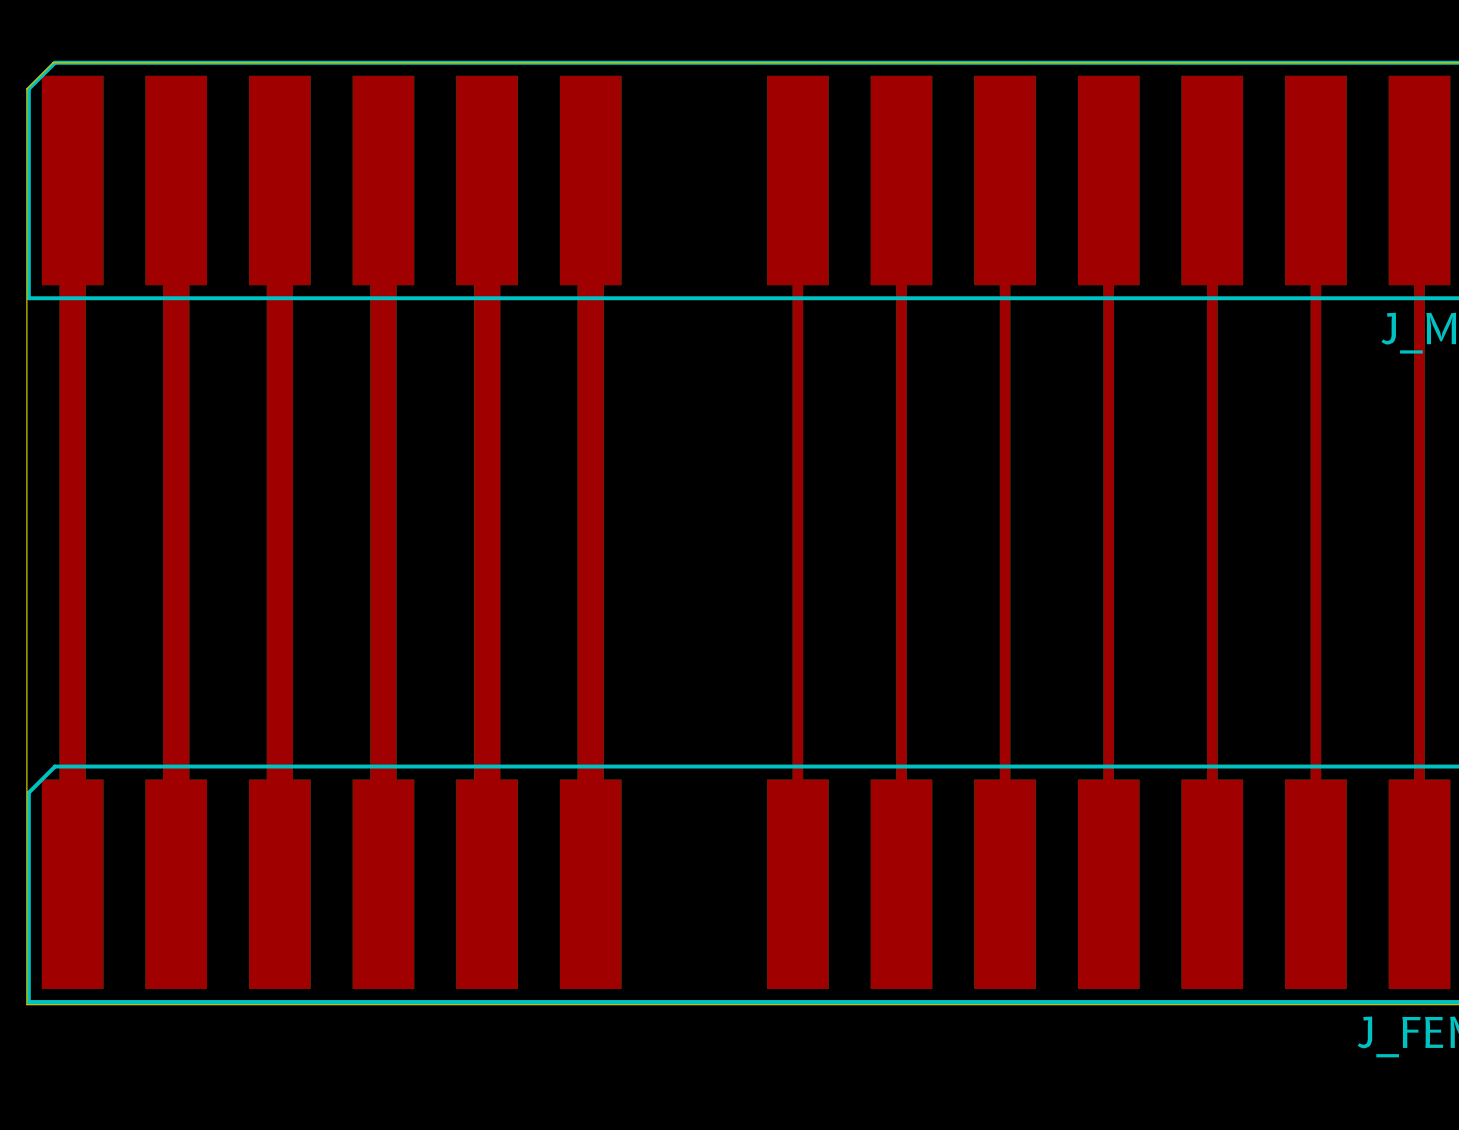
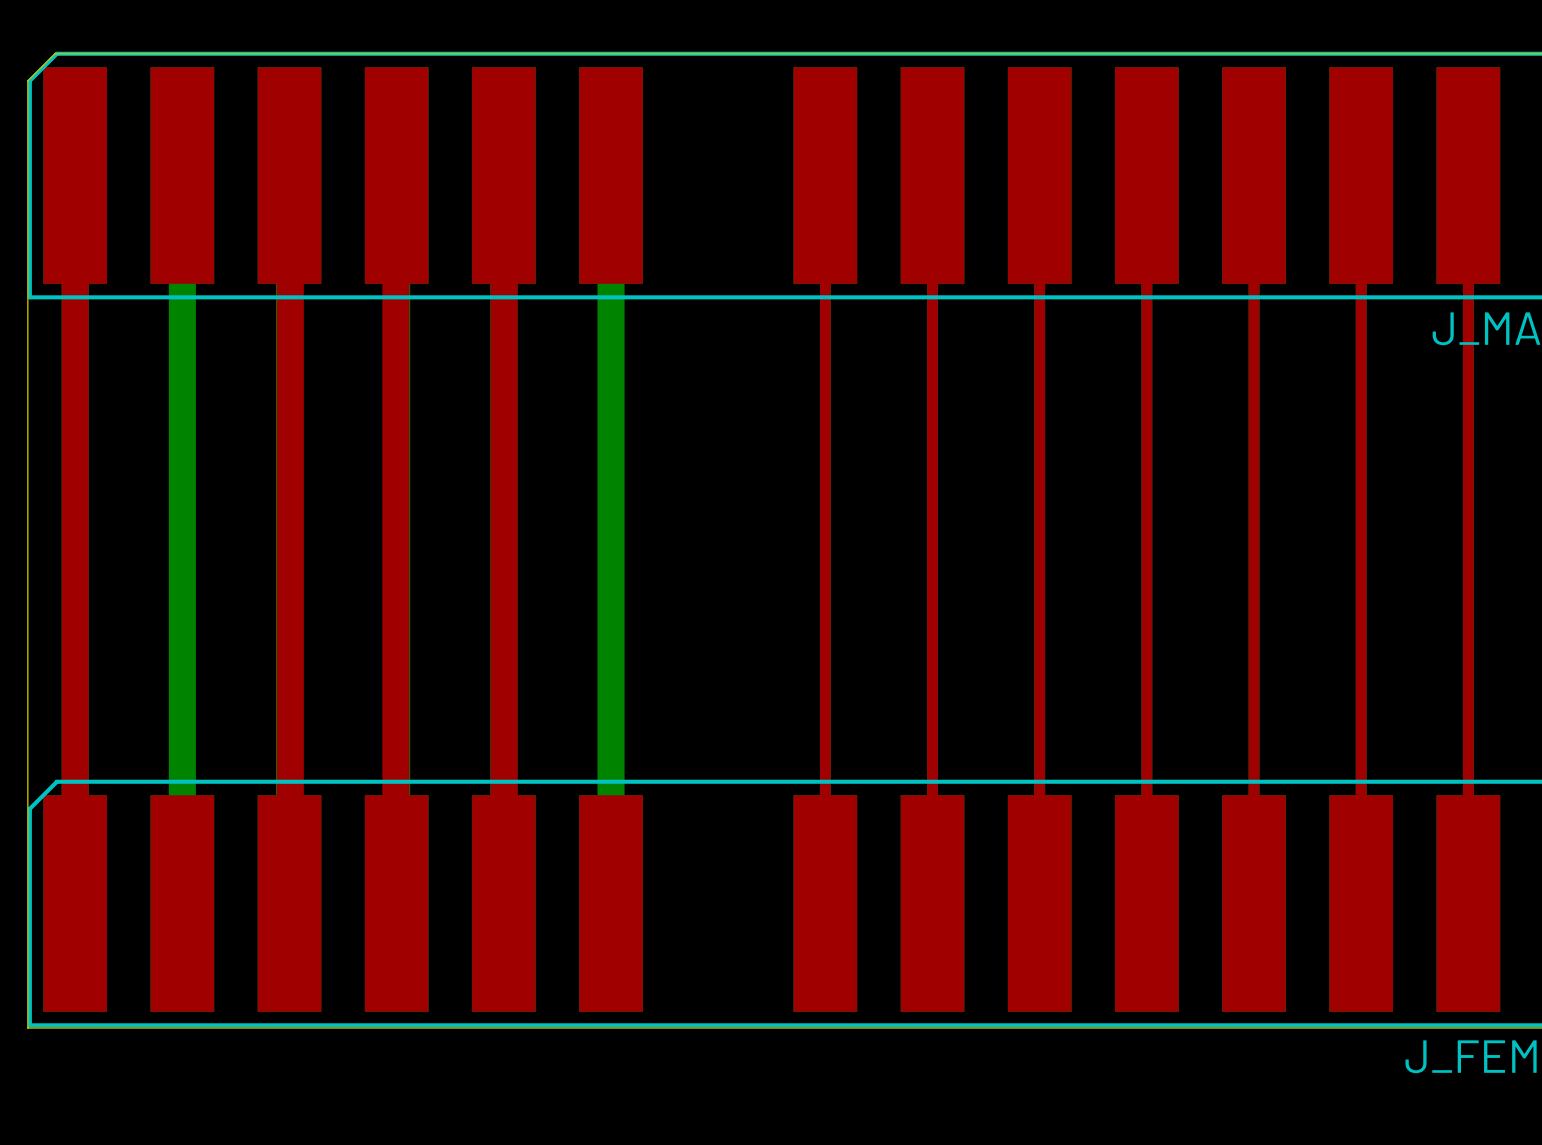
top track: (176, 180) (176, 884) -> none
top track: (279, 180) (279, 884) -> none
top track: (383, 180) (383, 884) -> none
top track: (590, 180) (590, 884) -> none
top track: none -> (395, 254) (395, 913)
top track: none -> (290, 262) (290, 921)

